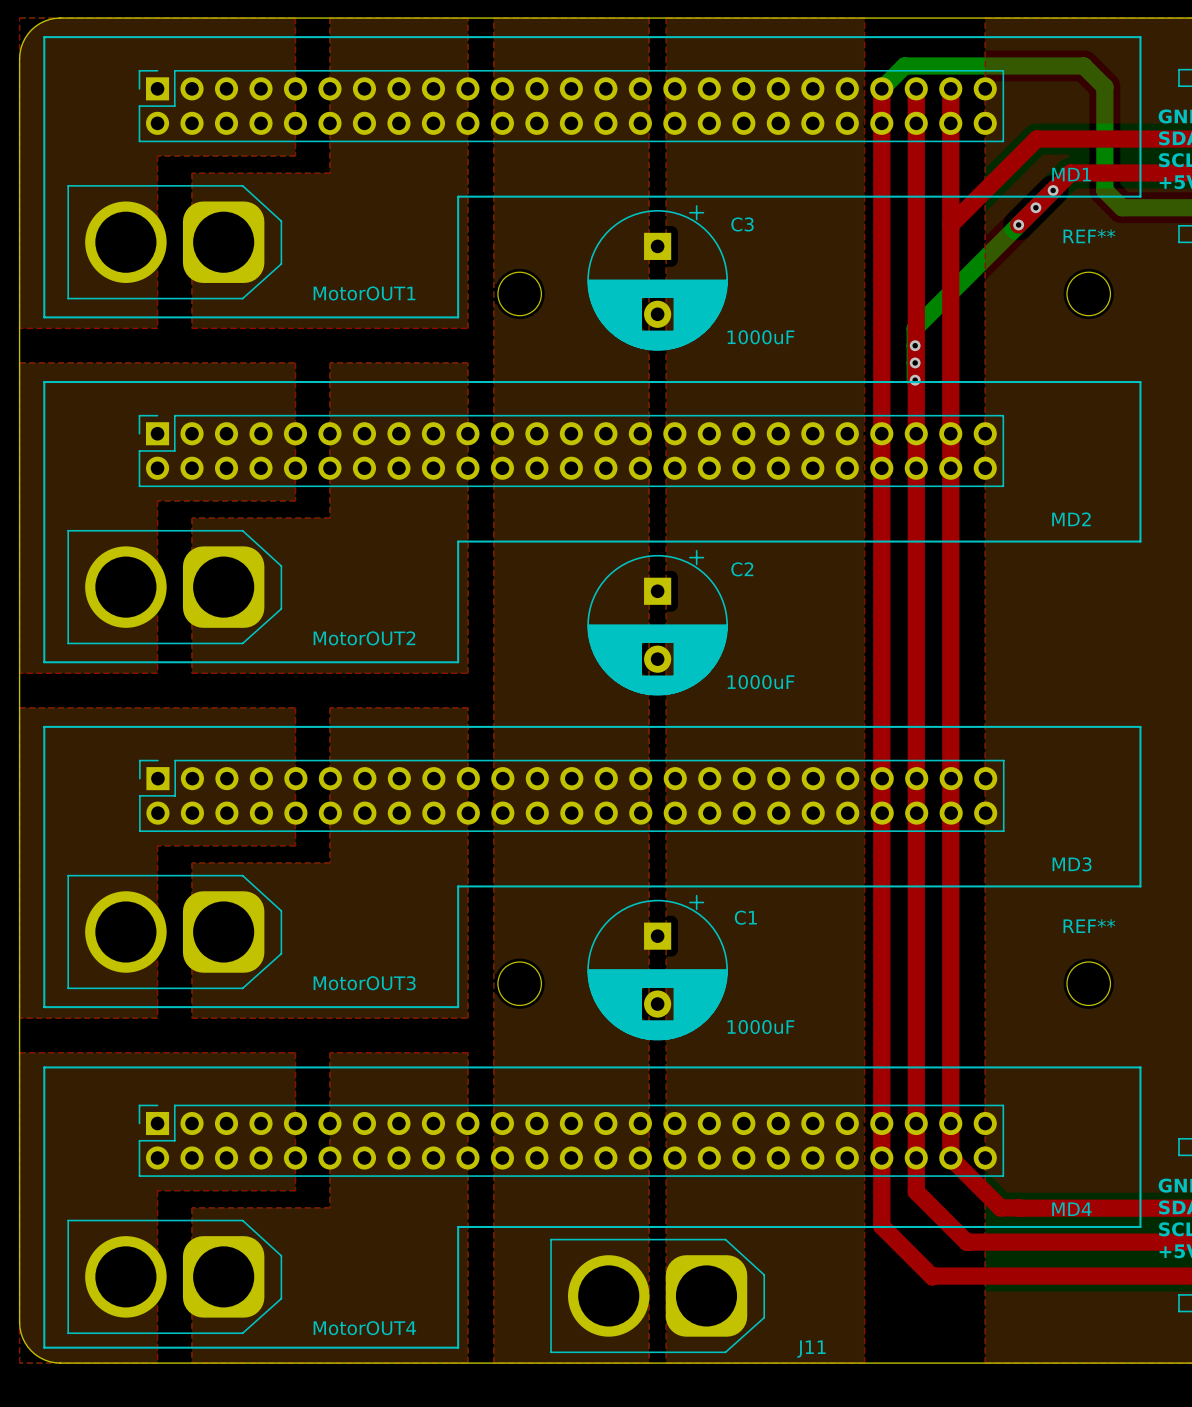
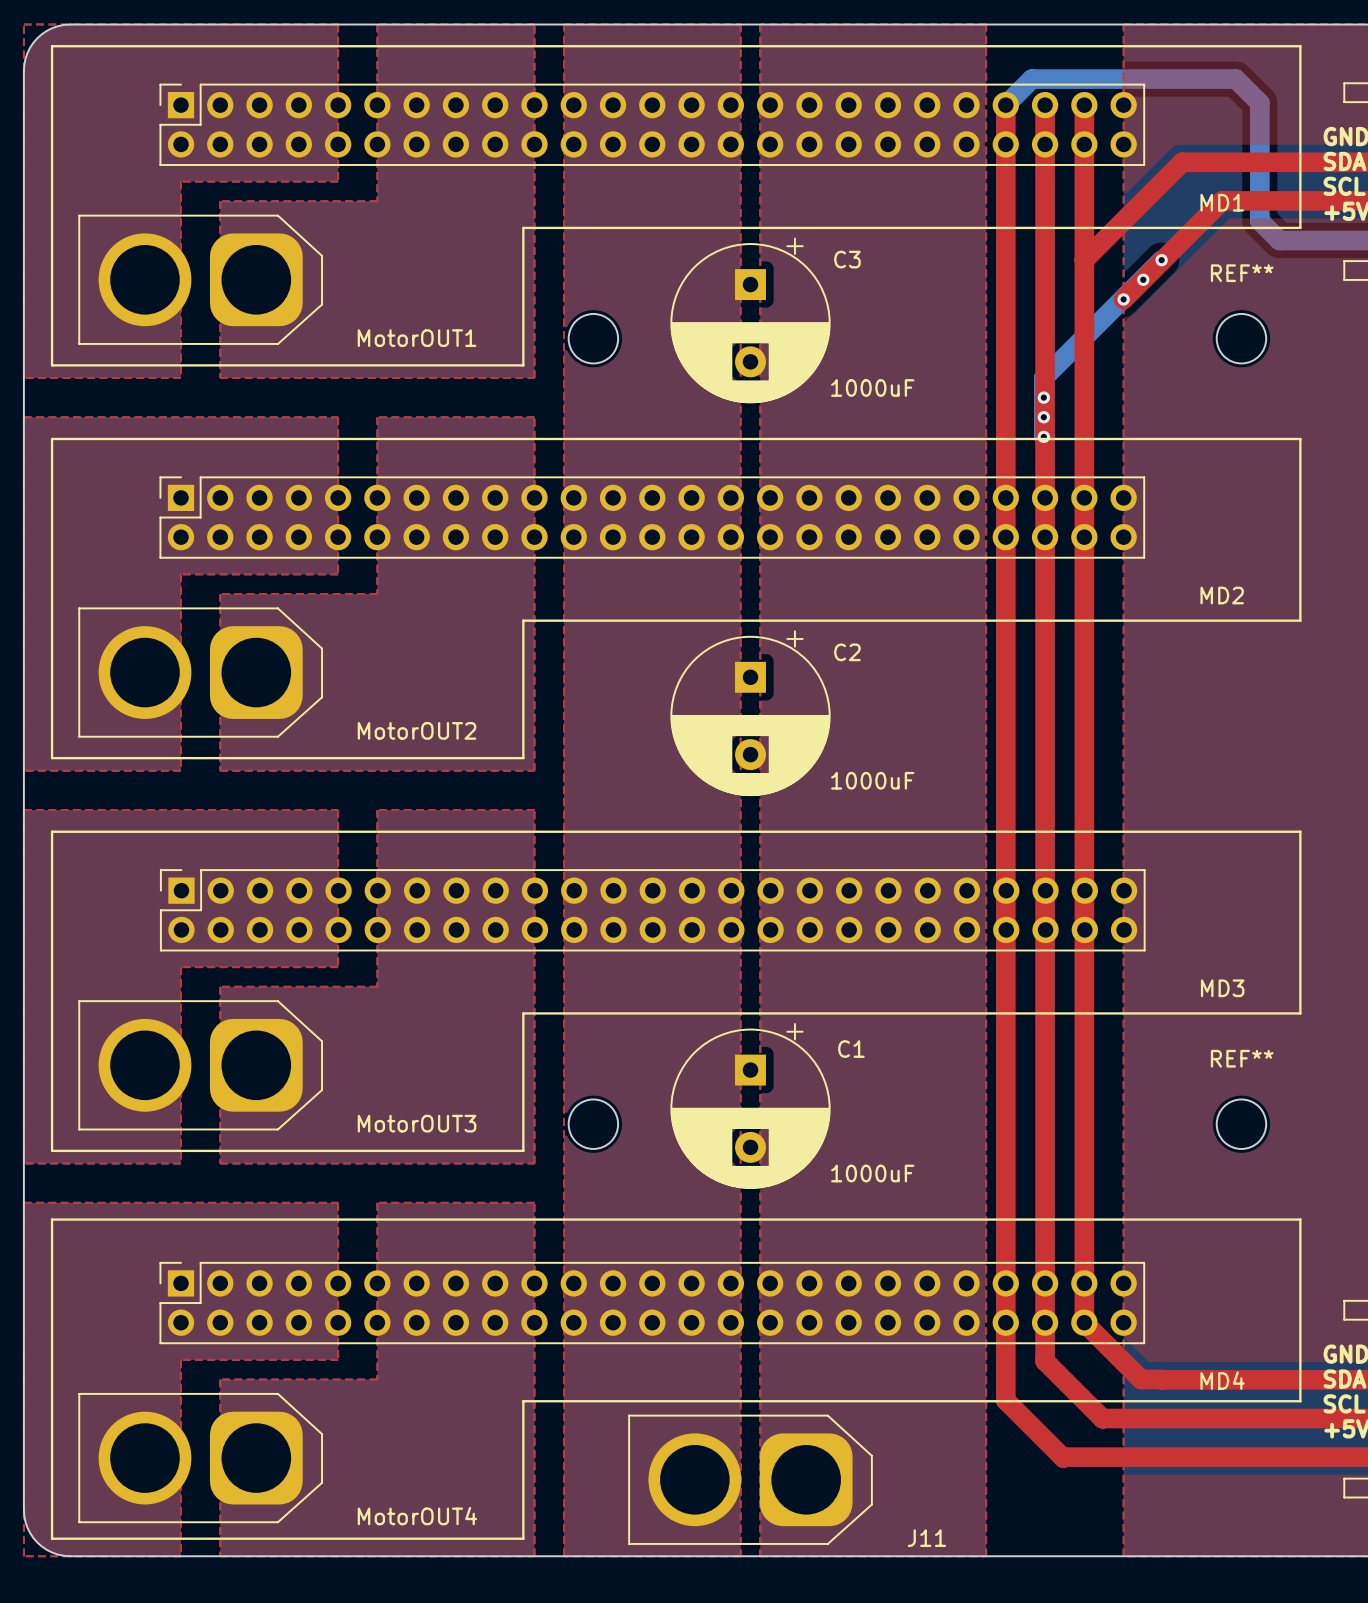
top track: (1071, 172) (1018, 224) -> (1222, 200) (1123, 299)
via: (1053, 190) -> none
via: (1035, 207) -> none
via: none -> (1143, 279)
via: none -> (1123, 299)

